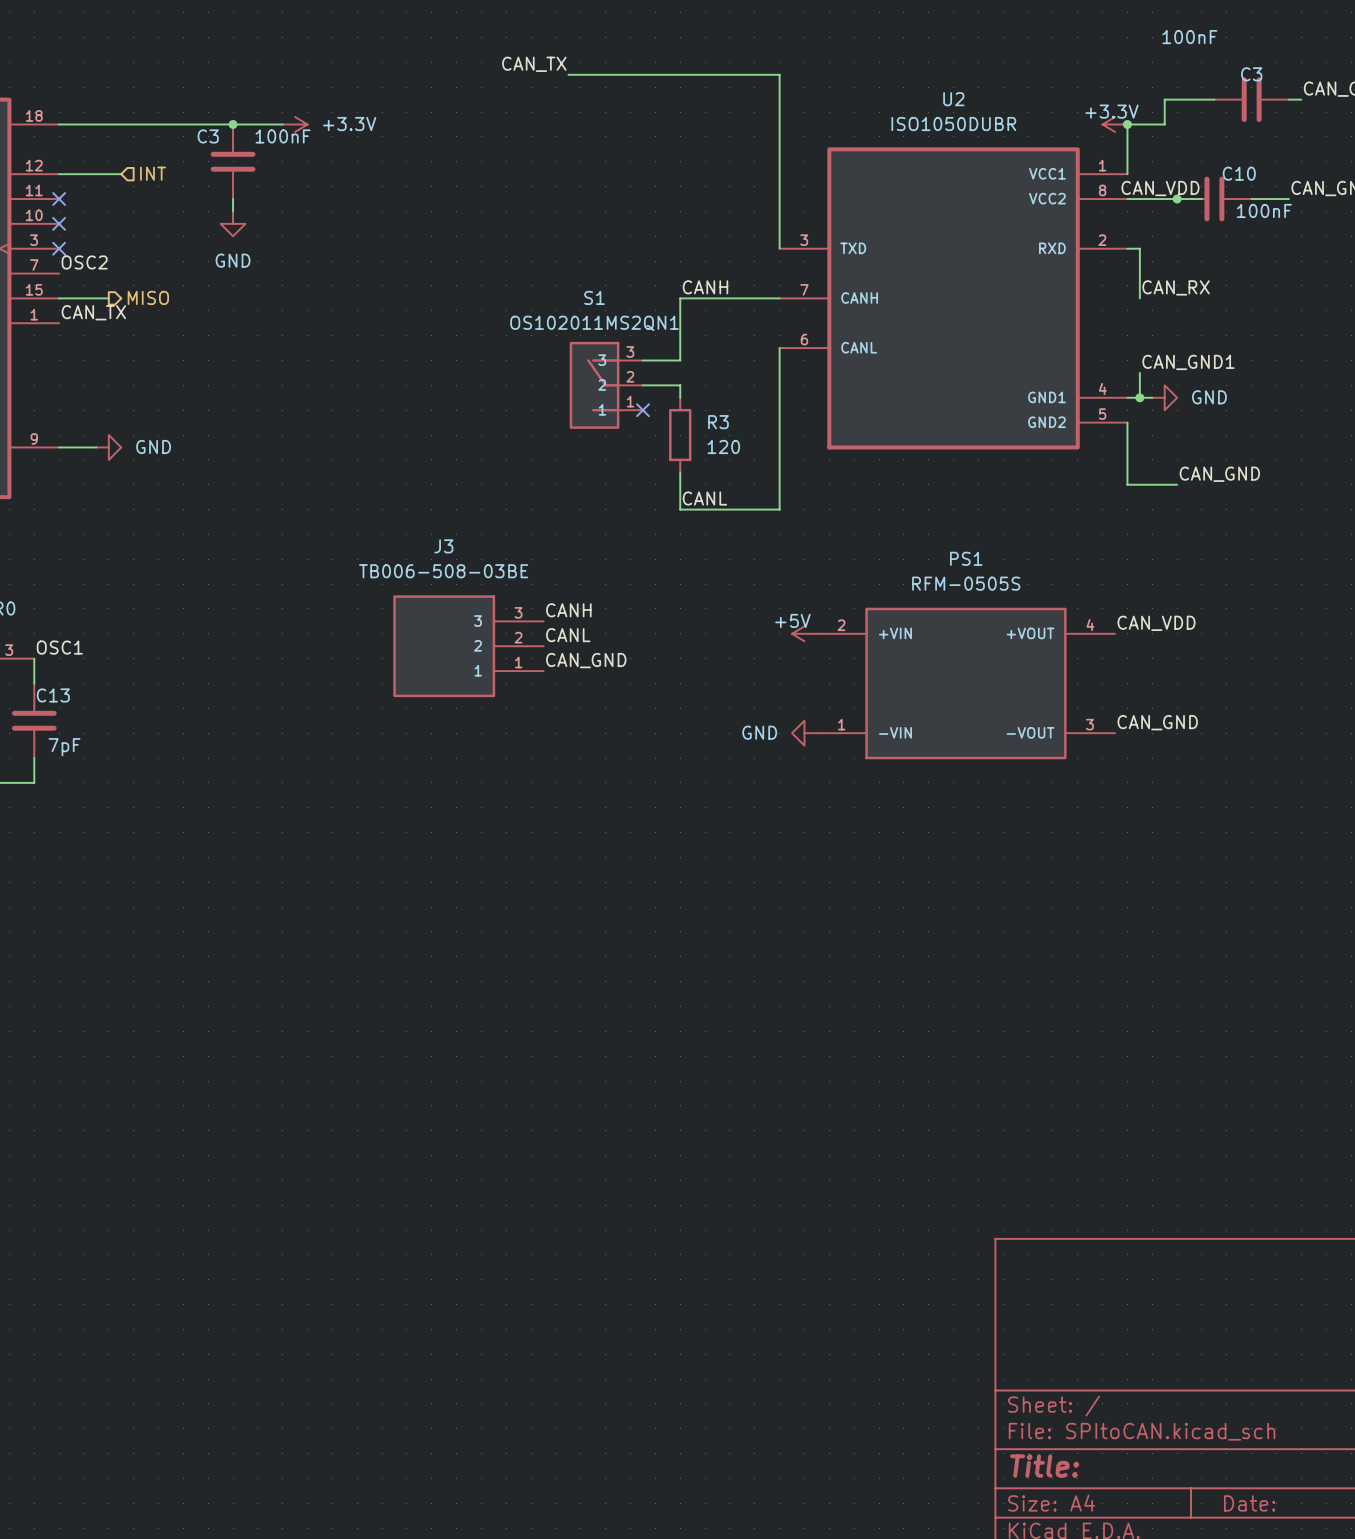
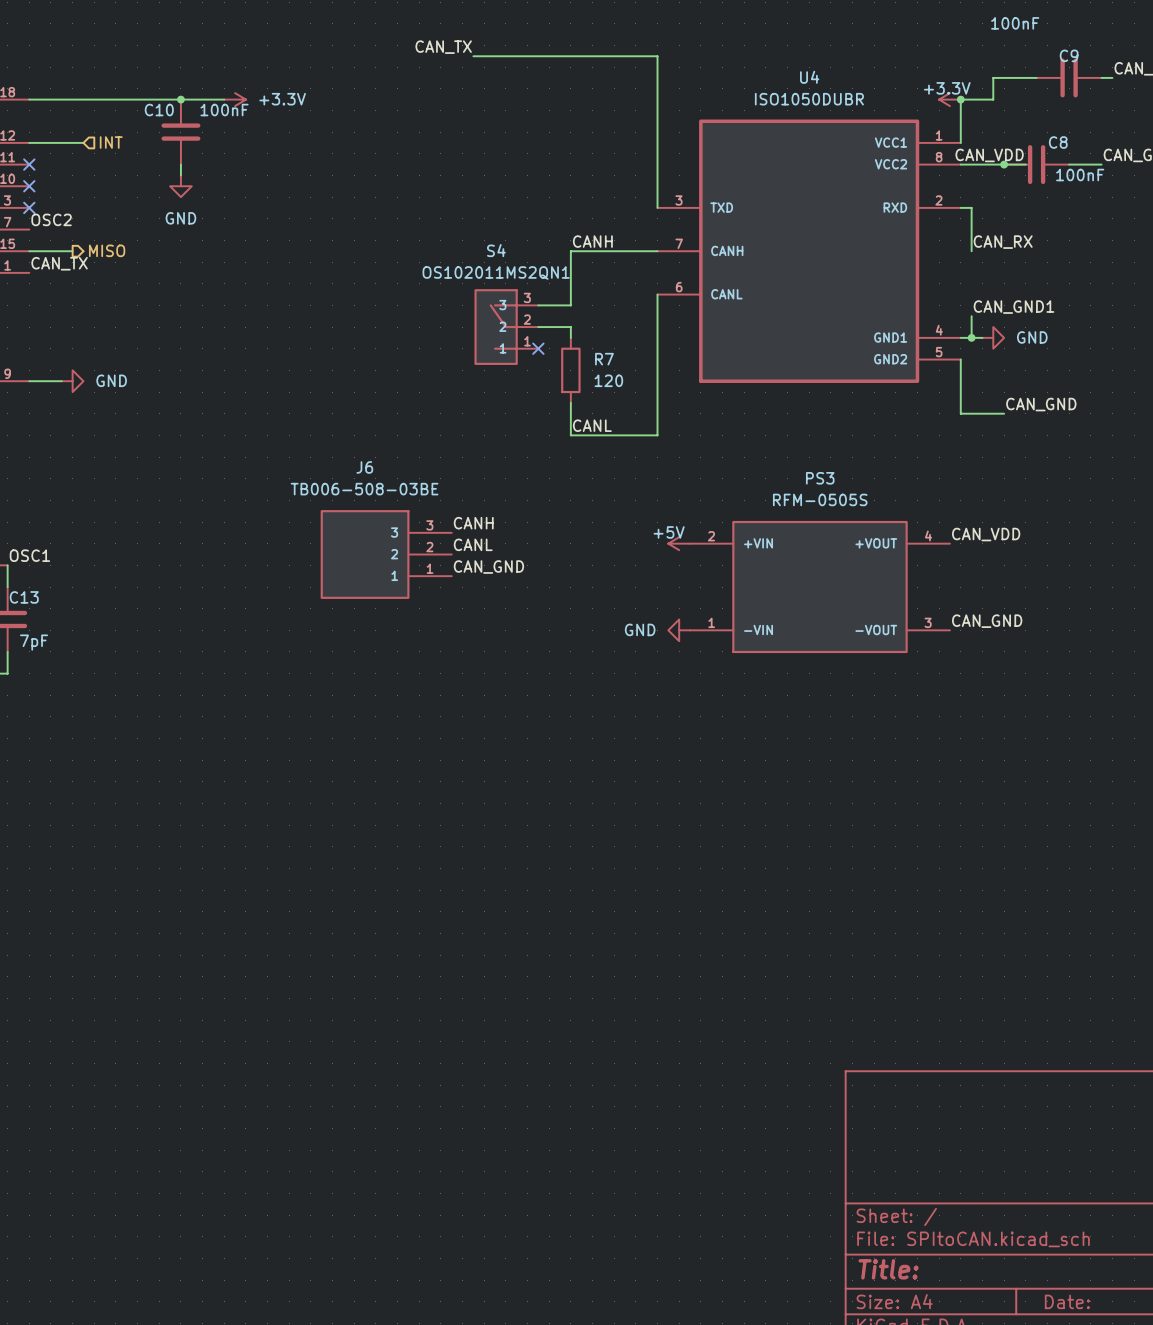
C3 name: C3 (1251, 74) -> C9 (1069, 55)
U2 name: U2 (953, 99) -> U4 (809, 77)
C3 name: C3 (208, 136) -> C10 (159, 110)
C10 name: C10 (1239, 173) -> C8 (1058, 142)
S1 name: S1 (594, 297) -> S4 (496, 250)
R3 name: R3 (718, 422) -> R7 (604, 359)
J3 name: J3 (443, 546) -> J6 (364, 467)
PS1 name: PS1 (966, 558) -> PS3 (820, 478)

